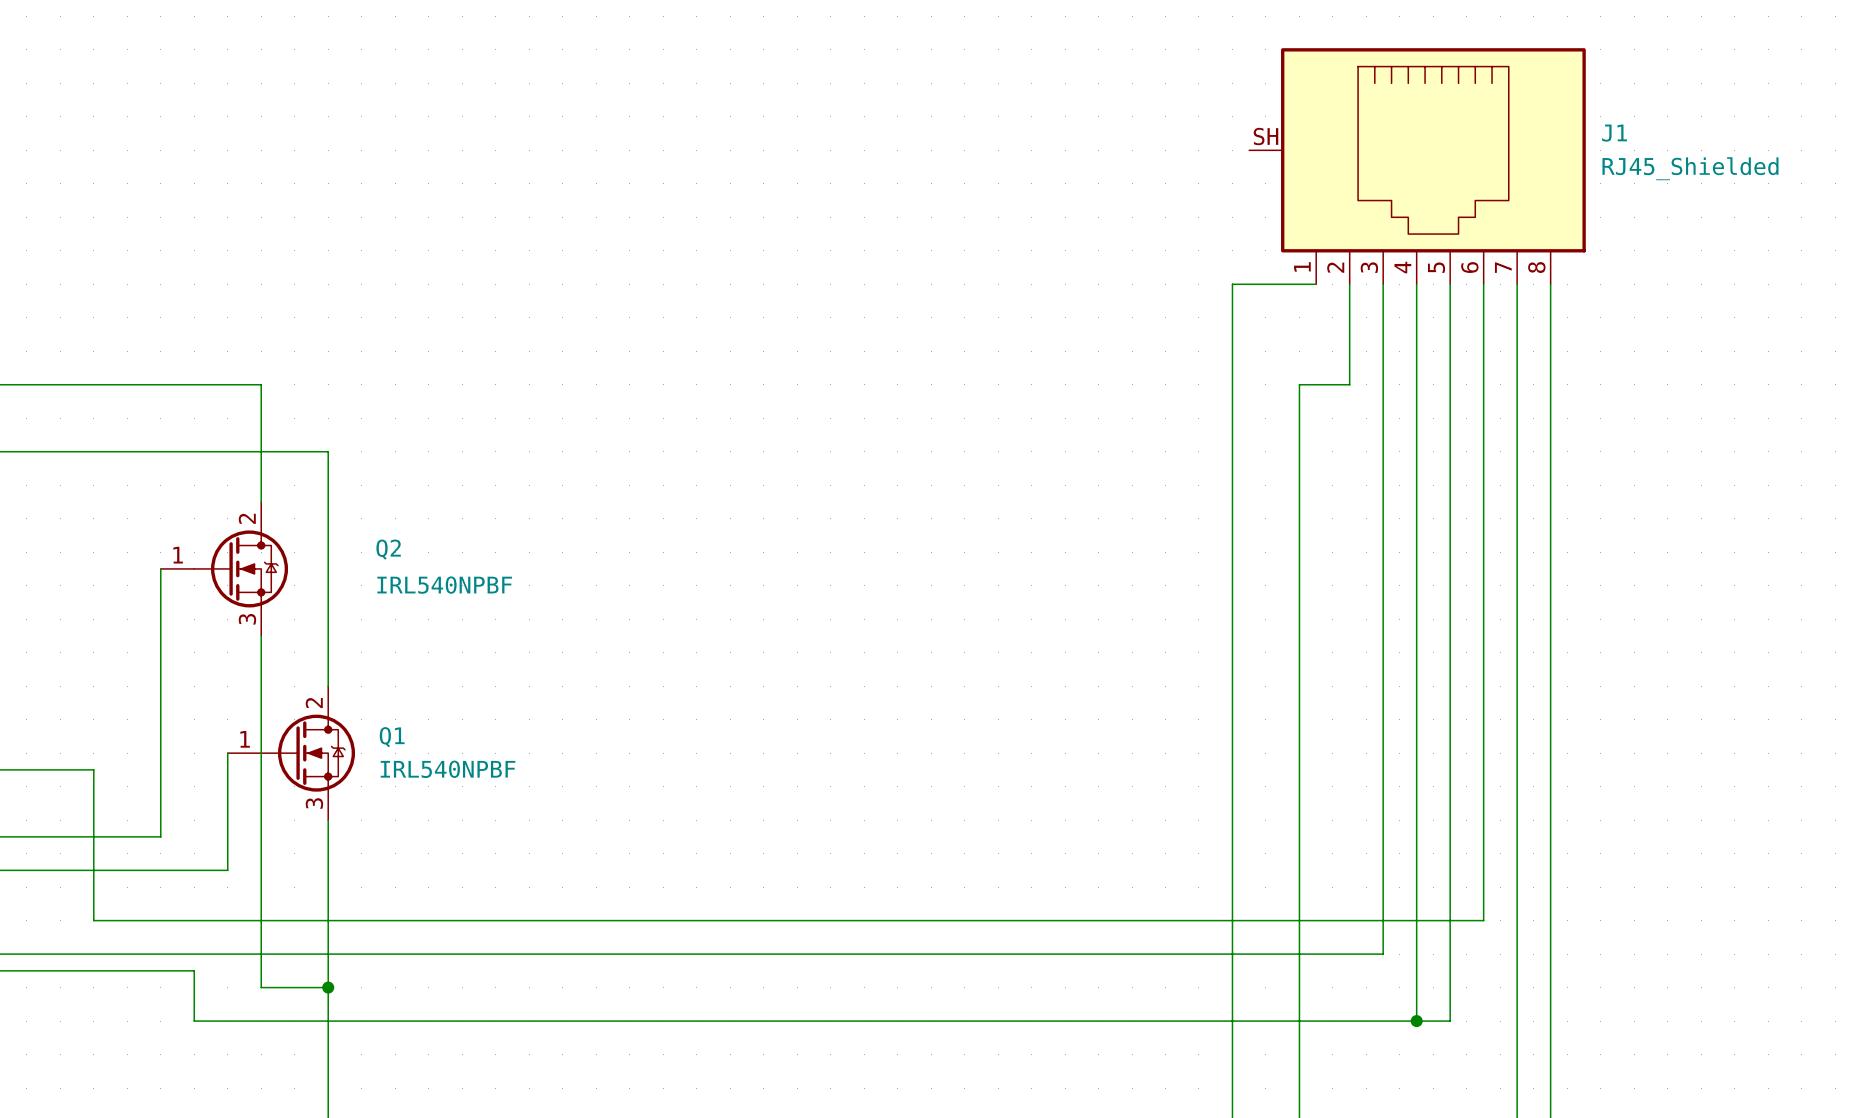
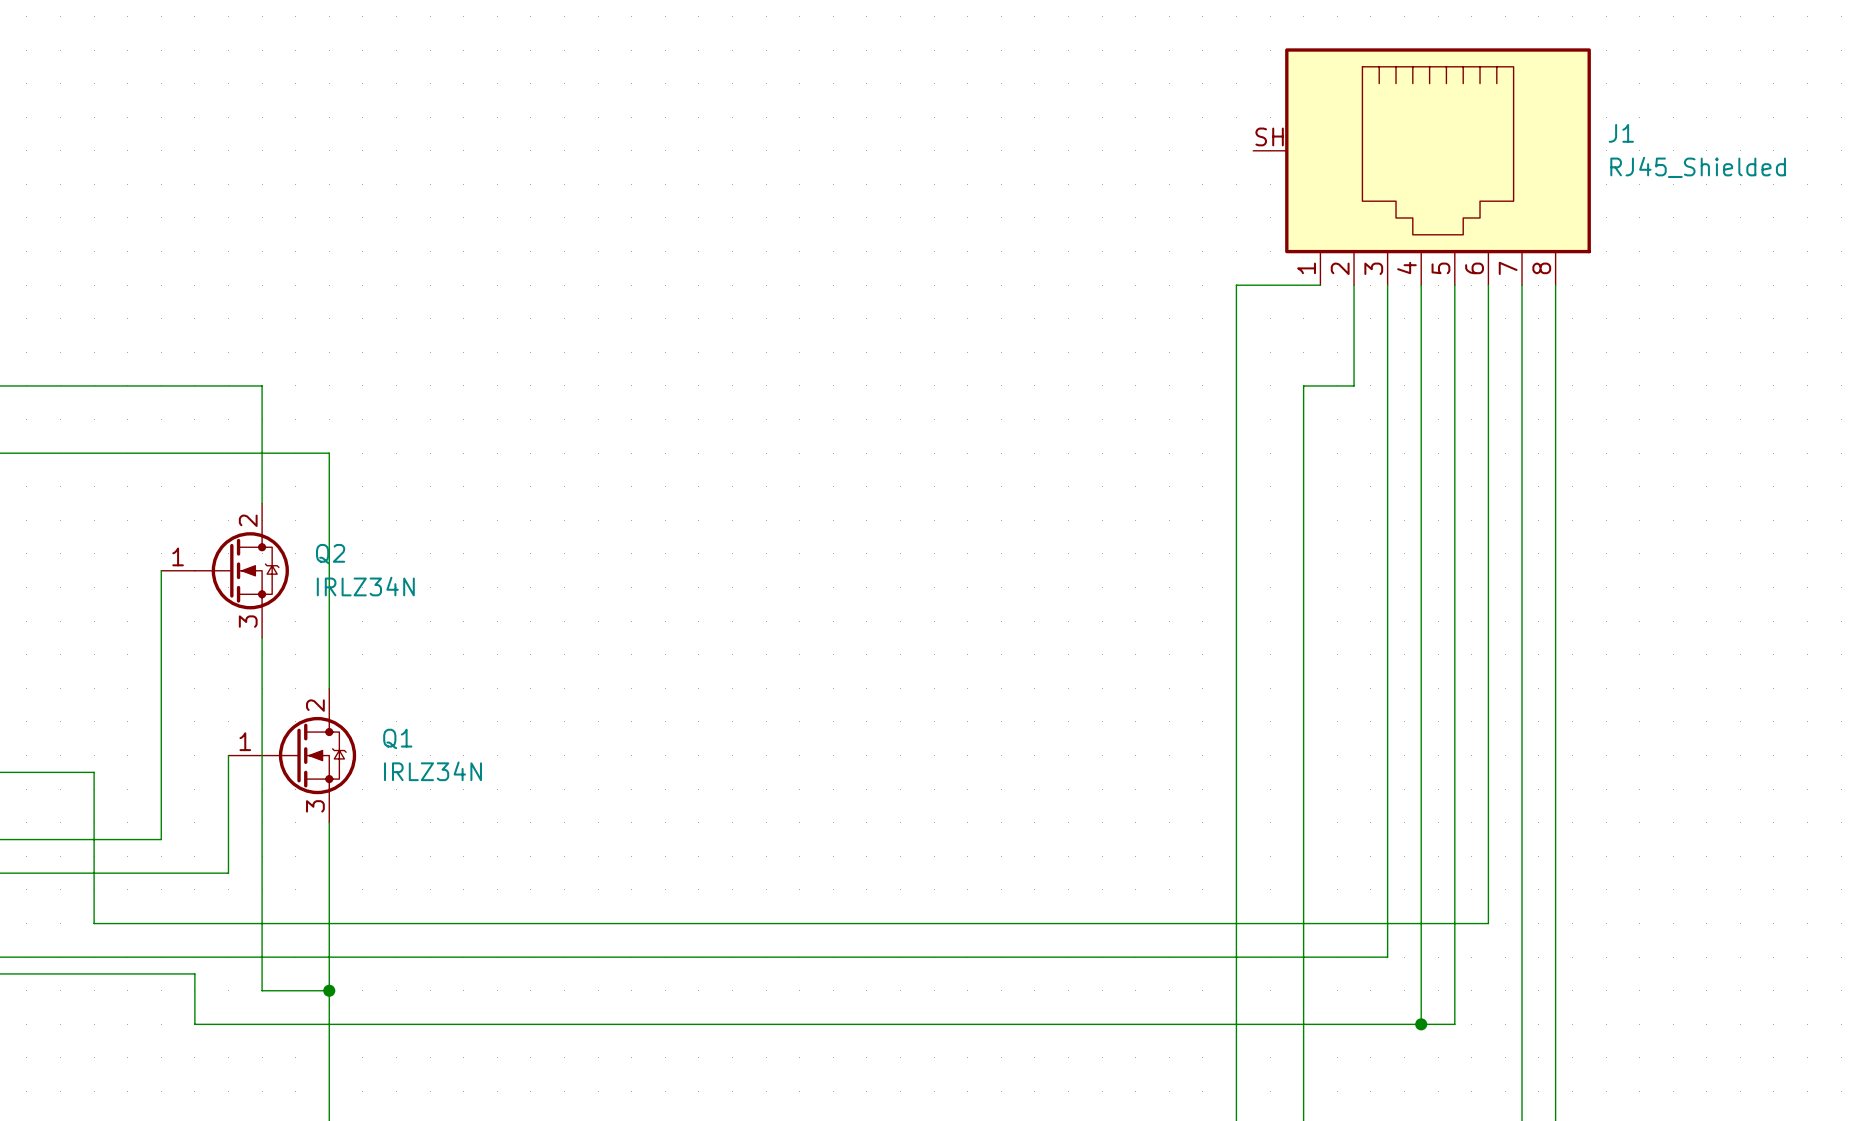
Q2 name position: Q2 (388, 549) -> Q2 (330, 554)
Q2 value: IRL540NPBF (444, 585) -> IRLZ34N (365, 586)
Q1 value: IRL540NPBF (448, 769) -> IRLZ34N (432, 771)

